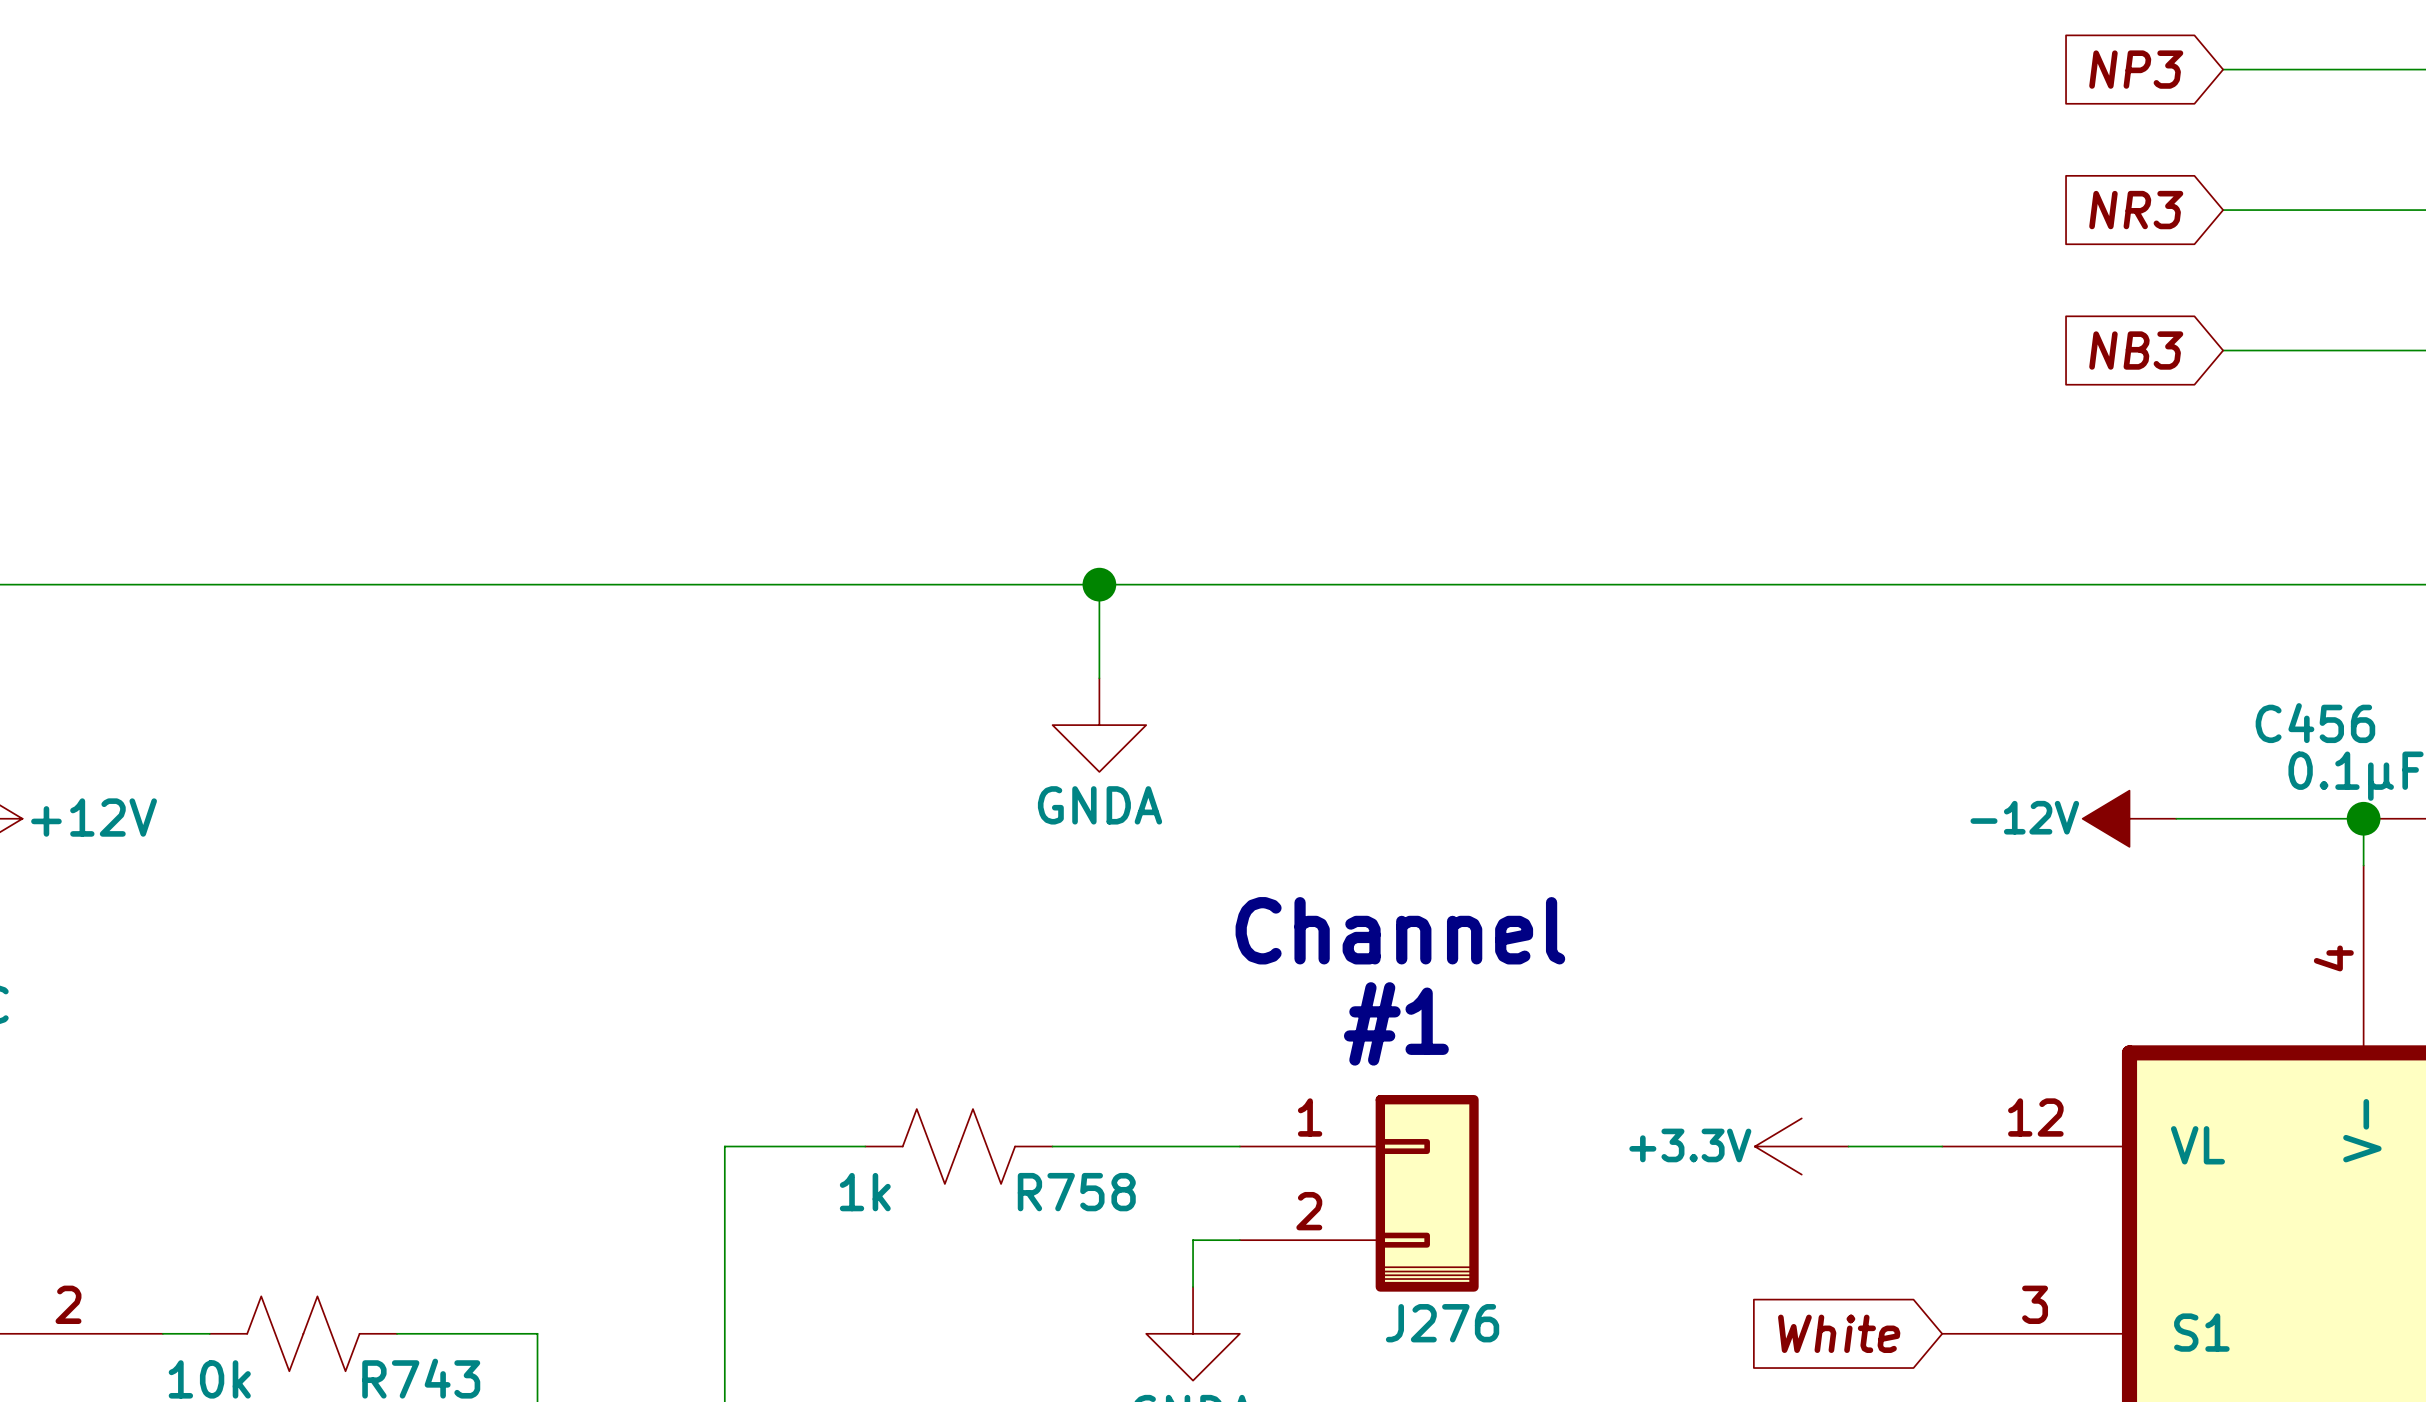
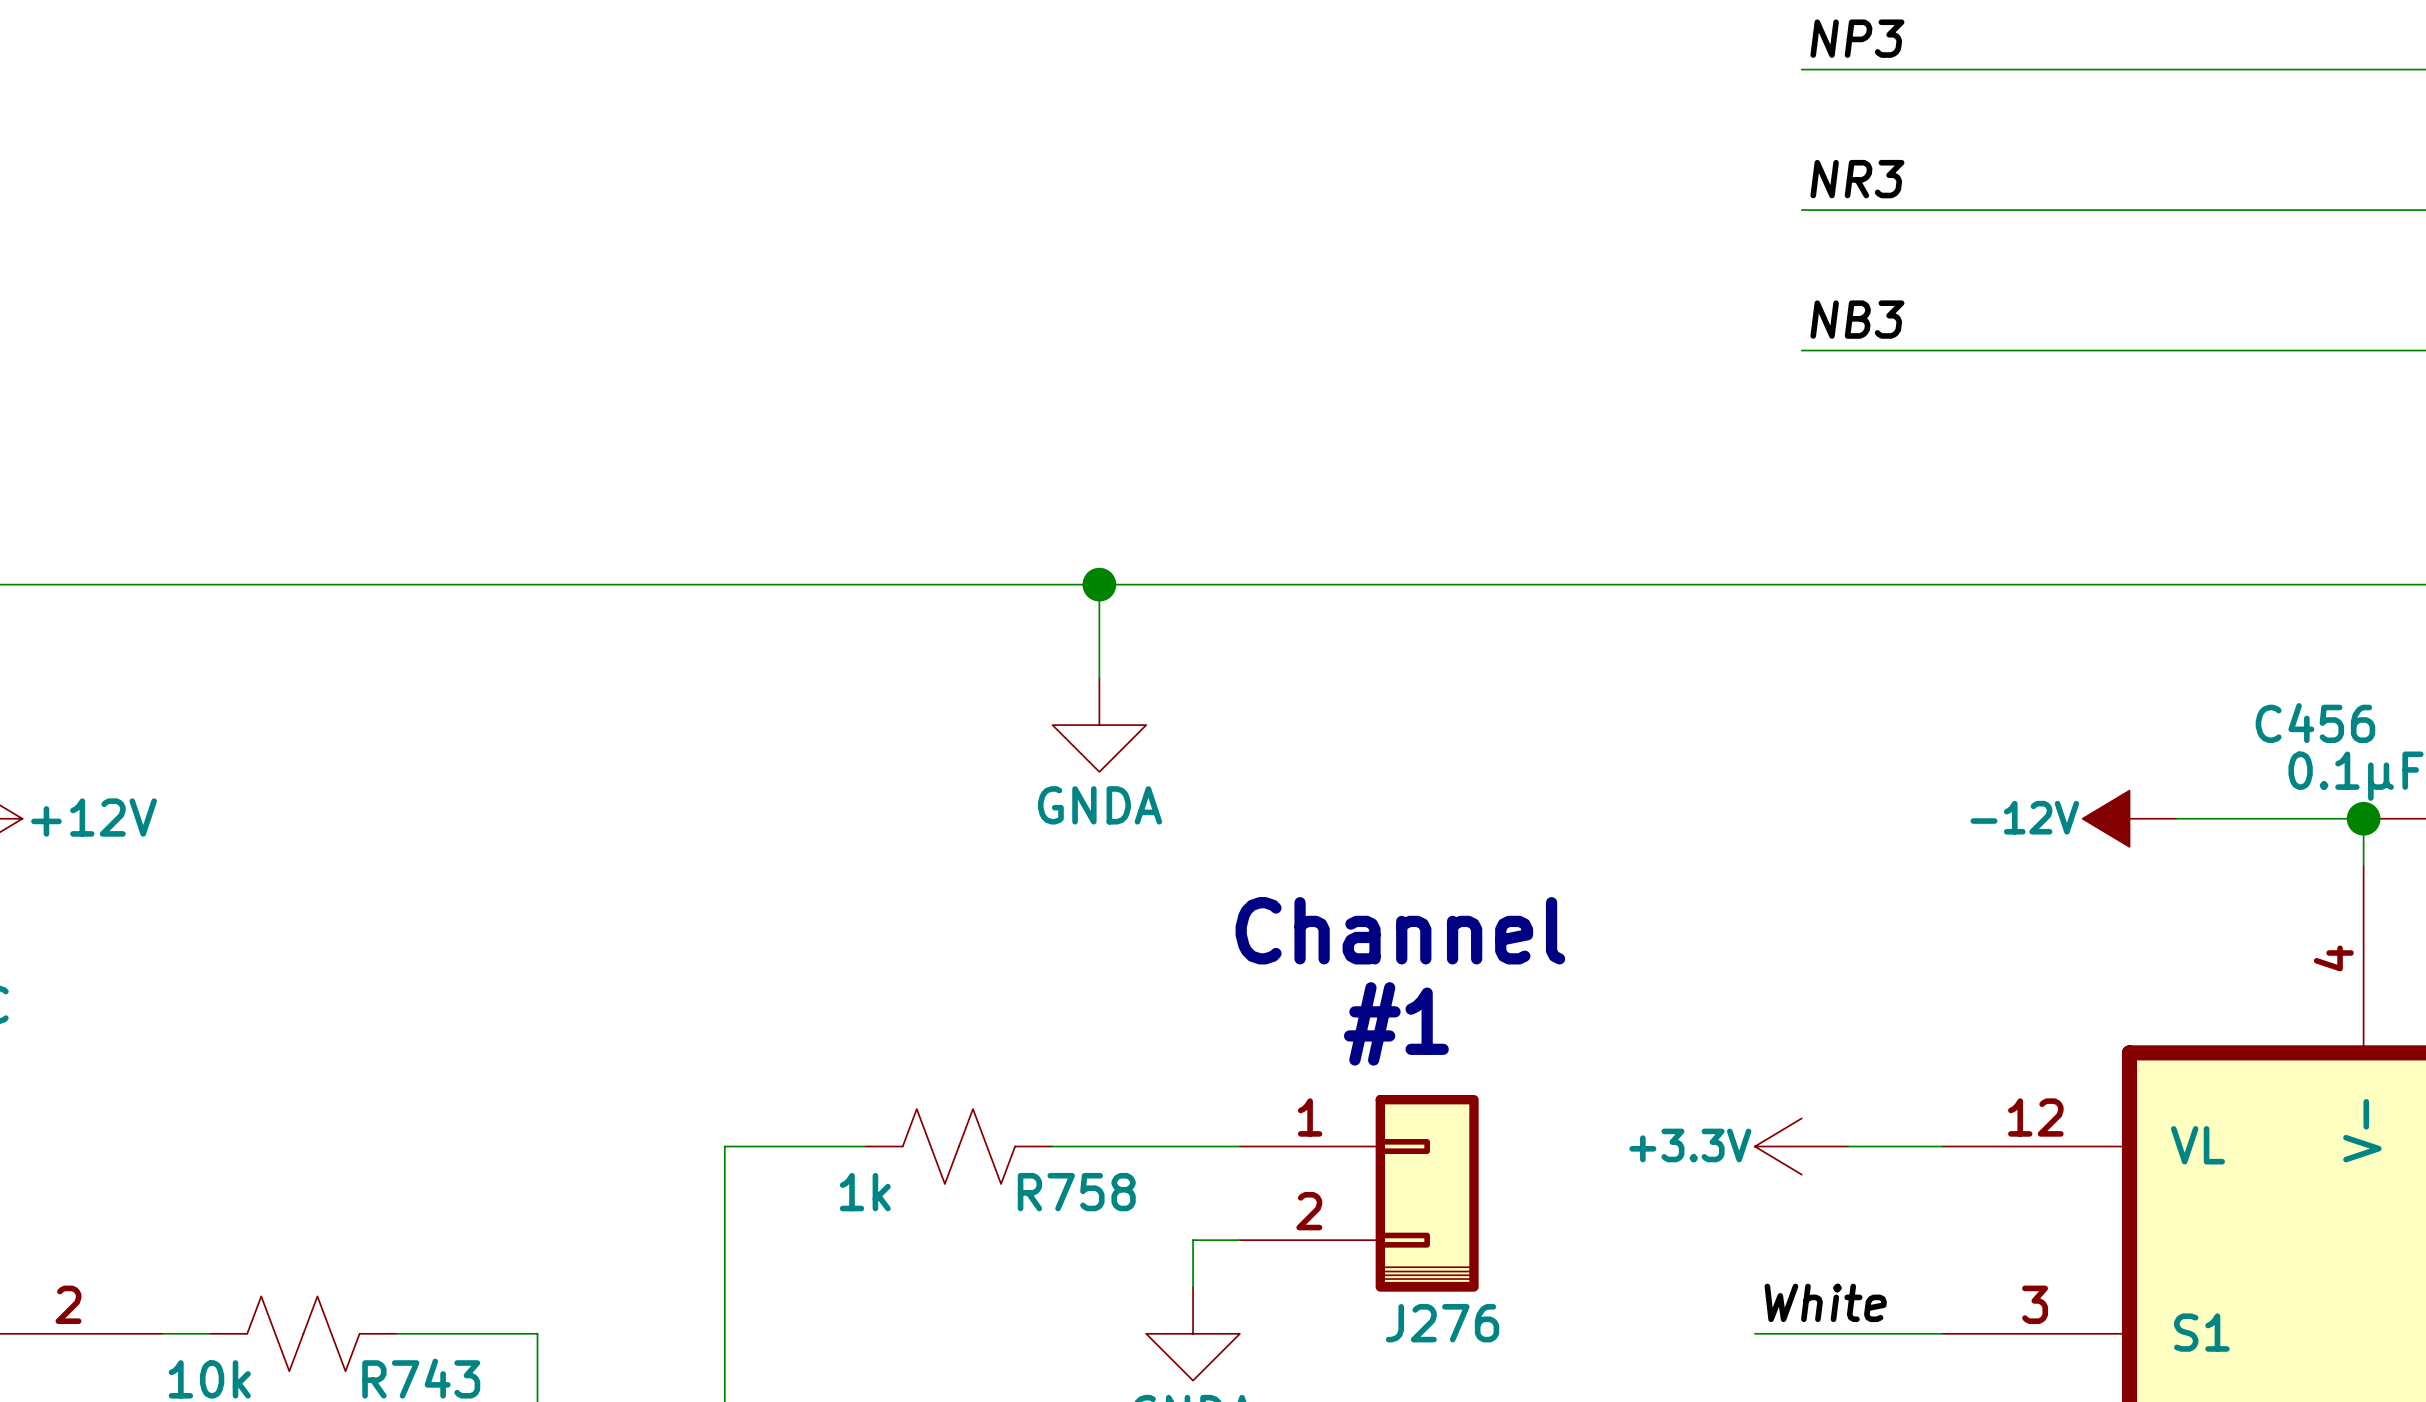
label: none -> NP3 (1857, 38)
wire: none -> (1801, 69) (2223, 69)
global label: NP3 (2136, 69) -> none
label: none -> NR3 (1857, 179)
wire: none -> (1801, 210) (2223, 210)
global label: NR3 (2136, 210) -> none
label: none -> NB3 (1857, 319)
wire: none -> (1801, 350) (2223, 350)
global label: NB3 (2136, 350) -> none
label: none -> White (1825, 1302)
wire: none -> (1754, 1333) (1942, 1333)
global label: White (1839, 1333) -> none

